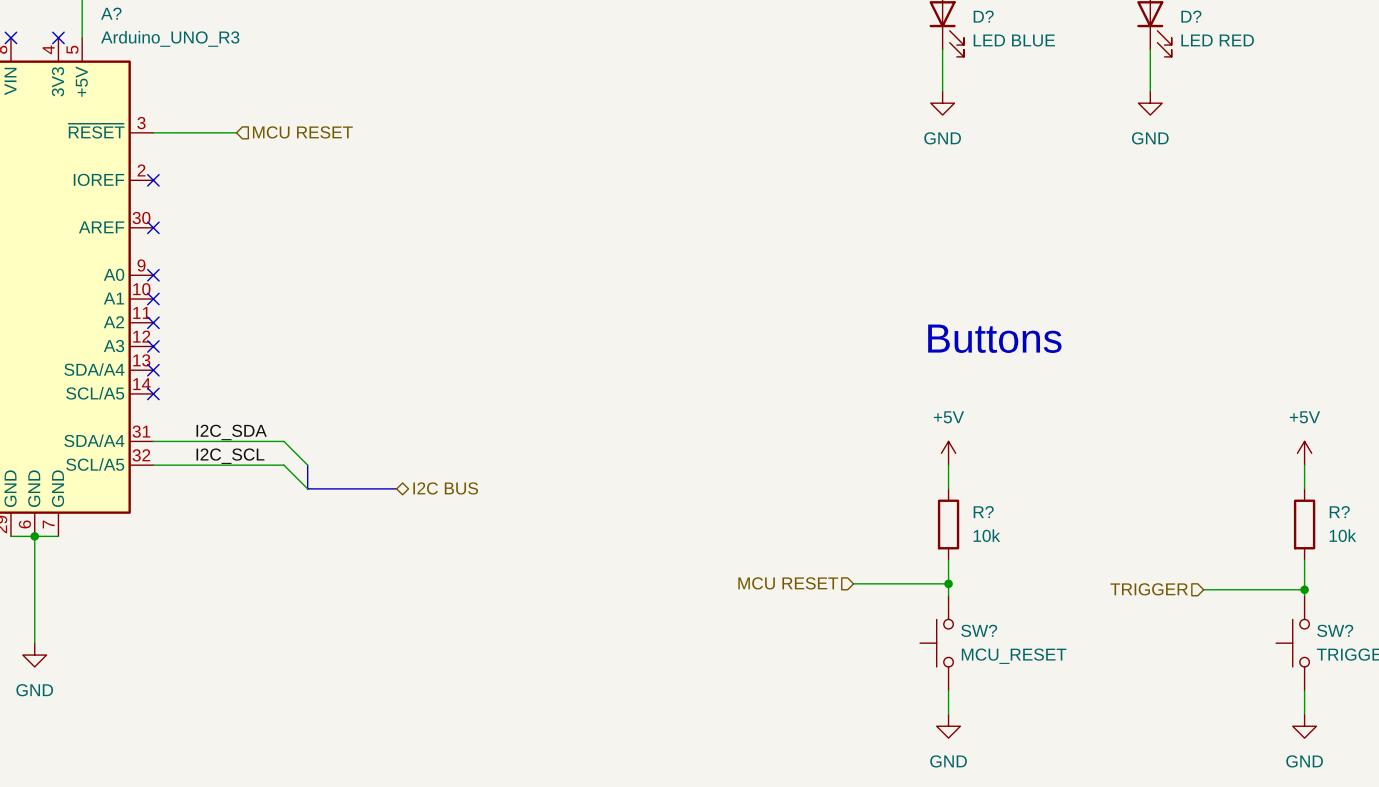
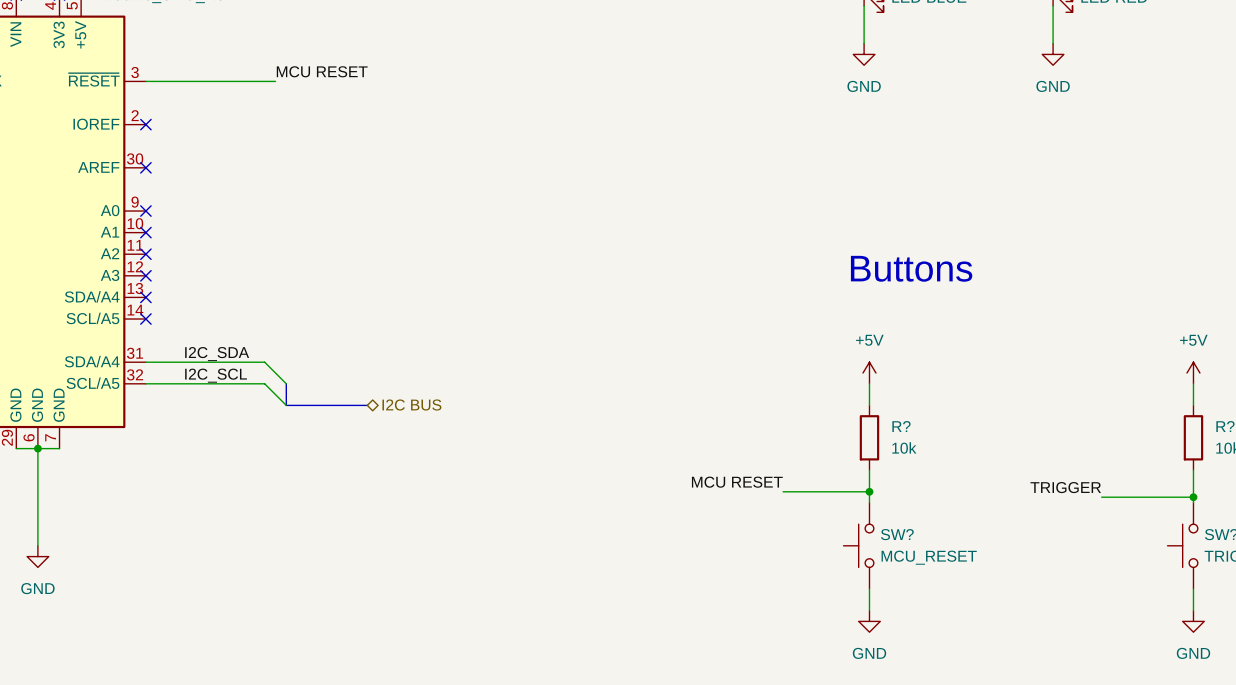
label: none -> MCU RESET (322, 71)
wire: none -> (221, 81) (275, 81)
hierarchical label: MCU RESET (302, 132) -> none
label: none -> MCU RESET (737, 482)
label: none -> TRIGGER (1065, 487)
hierarchical label: MCU RESET (788, 583) -> none
hierarchical label: TRIGGER (1149, 589) -> none

